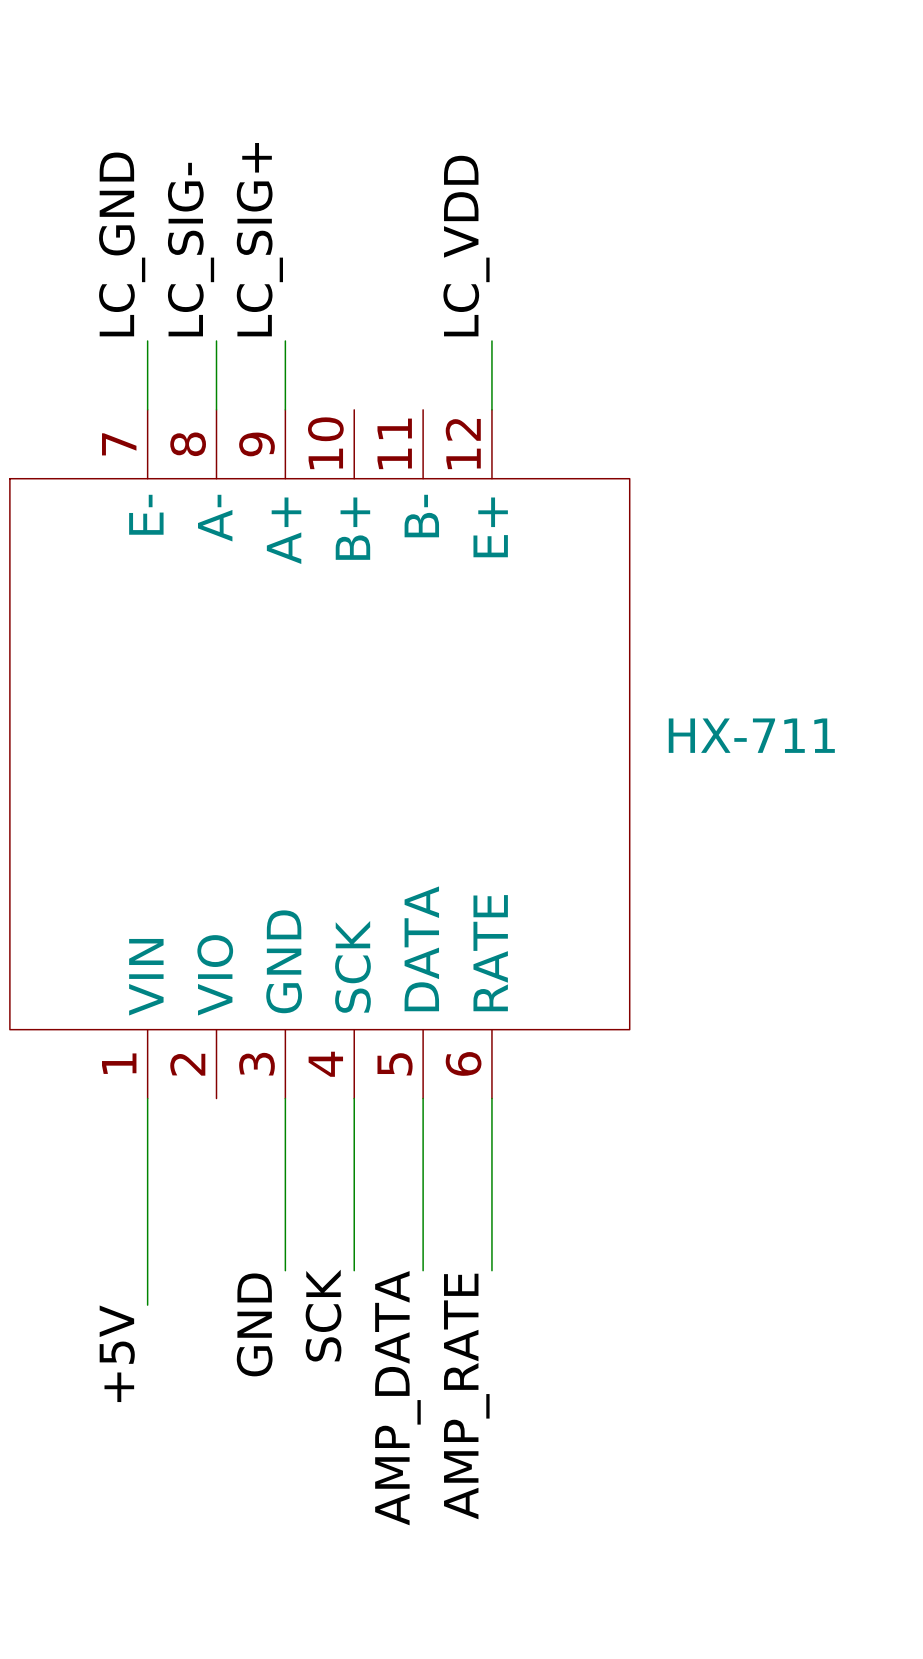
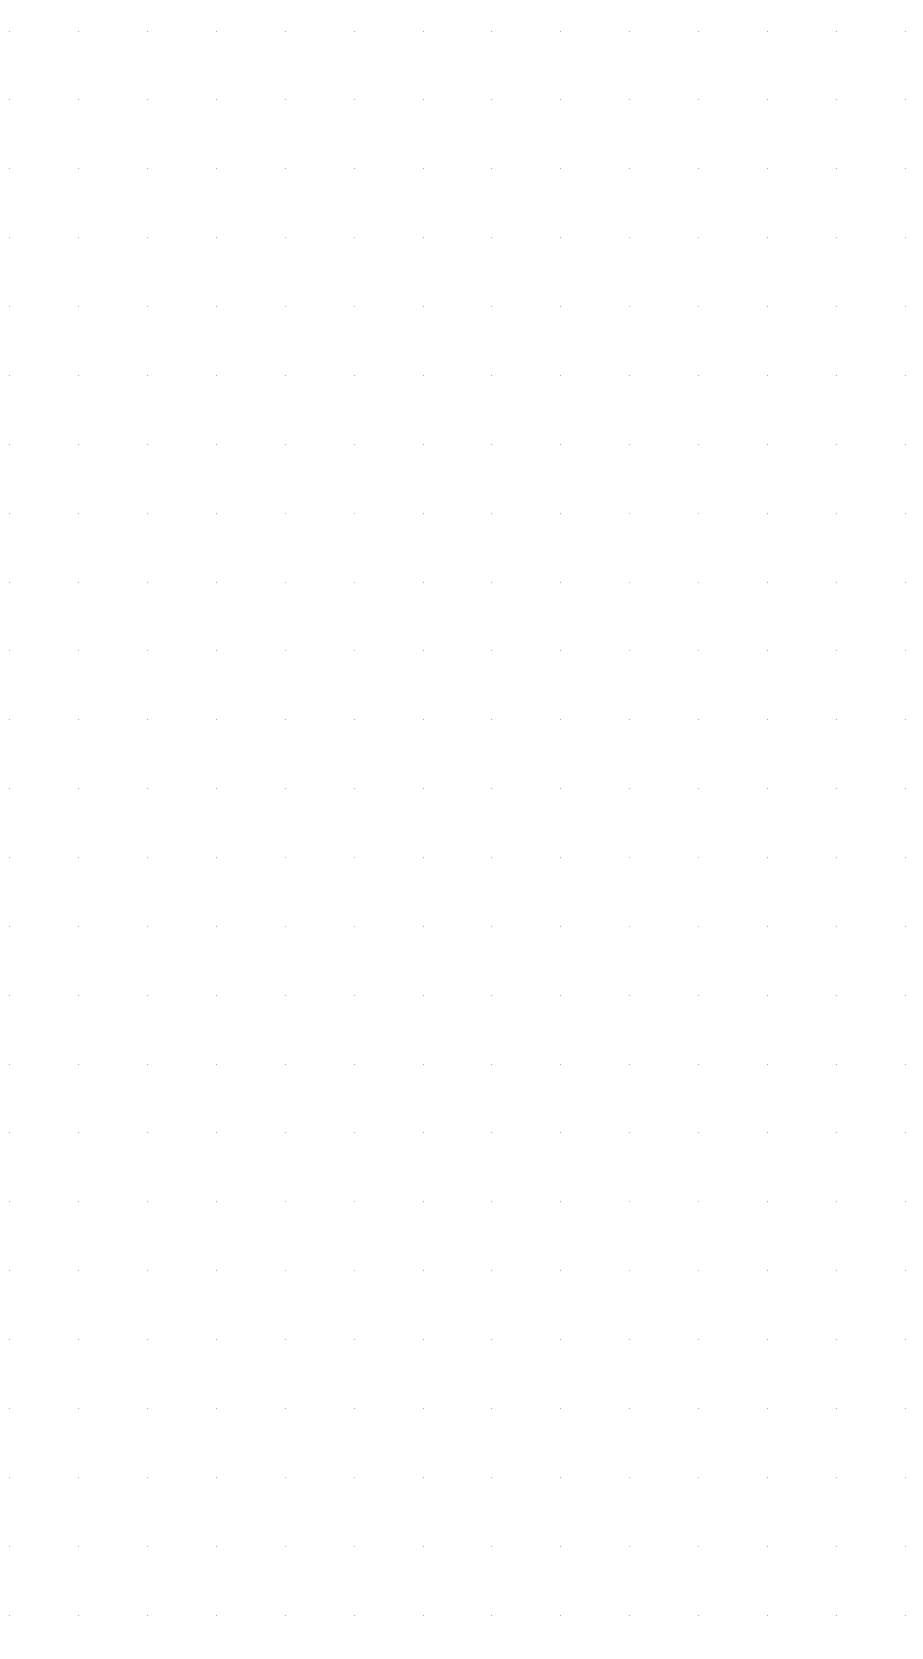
label: LC_SIG+ (259, 239) -> none
label: LC_GND (122, 244) -> none
label: LC_VDD (466, 246) -> none
label: LC_SIG- (191, 249) -> none
wire: (147, 340) (147, 409) -> none
wire: (216, 340) (216, 409) -> none
wire: (285, 340) (285, 409) -> none
wire: (491, 340) (491, 409) -> none
HX-711: (319, 754) -> none
wire: (147, 1098) (147, 1305) -> none
wire: (285, 1098) (285, 1270) -> none
wire: (354, 1098) (354, 1270) -> none
wire: (423, 1098) (423, 1270) -> none
wire: (491, 1098) (491, 1270) -> none
label: SCK (323, 1315) -> none
label: GND (254, 1324) -> none
label: +5V (117, 1353) -> none
label: AMP_RATE (466, 1396) -> none
label: AMP_DATA (397, 1398) -> none

